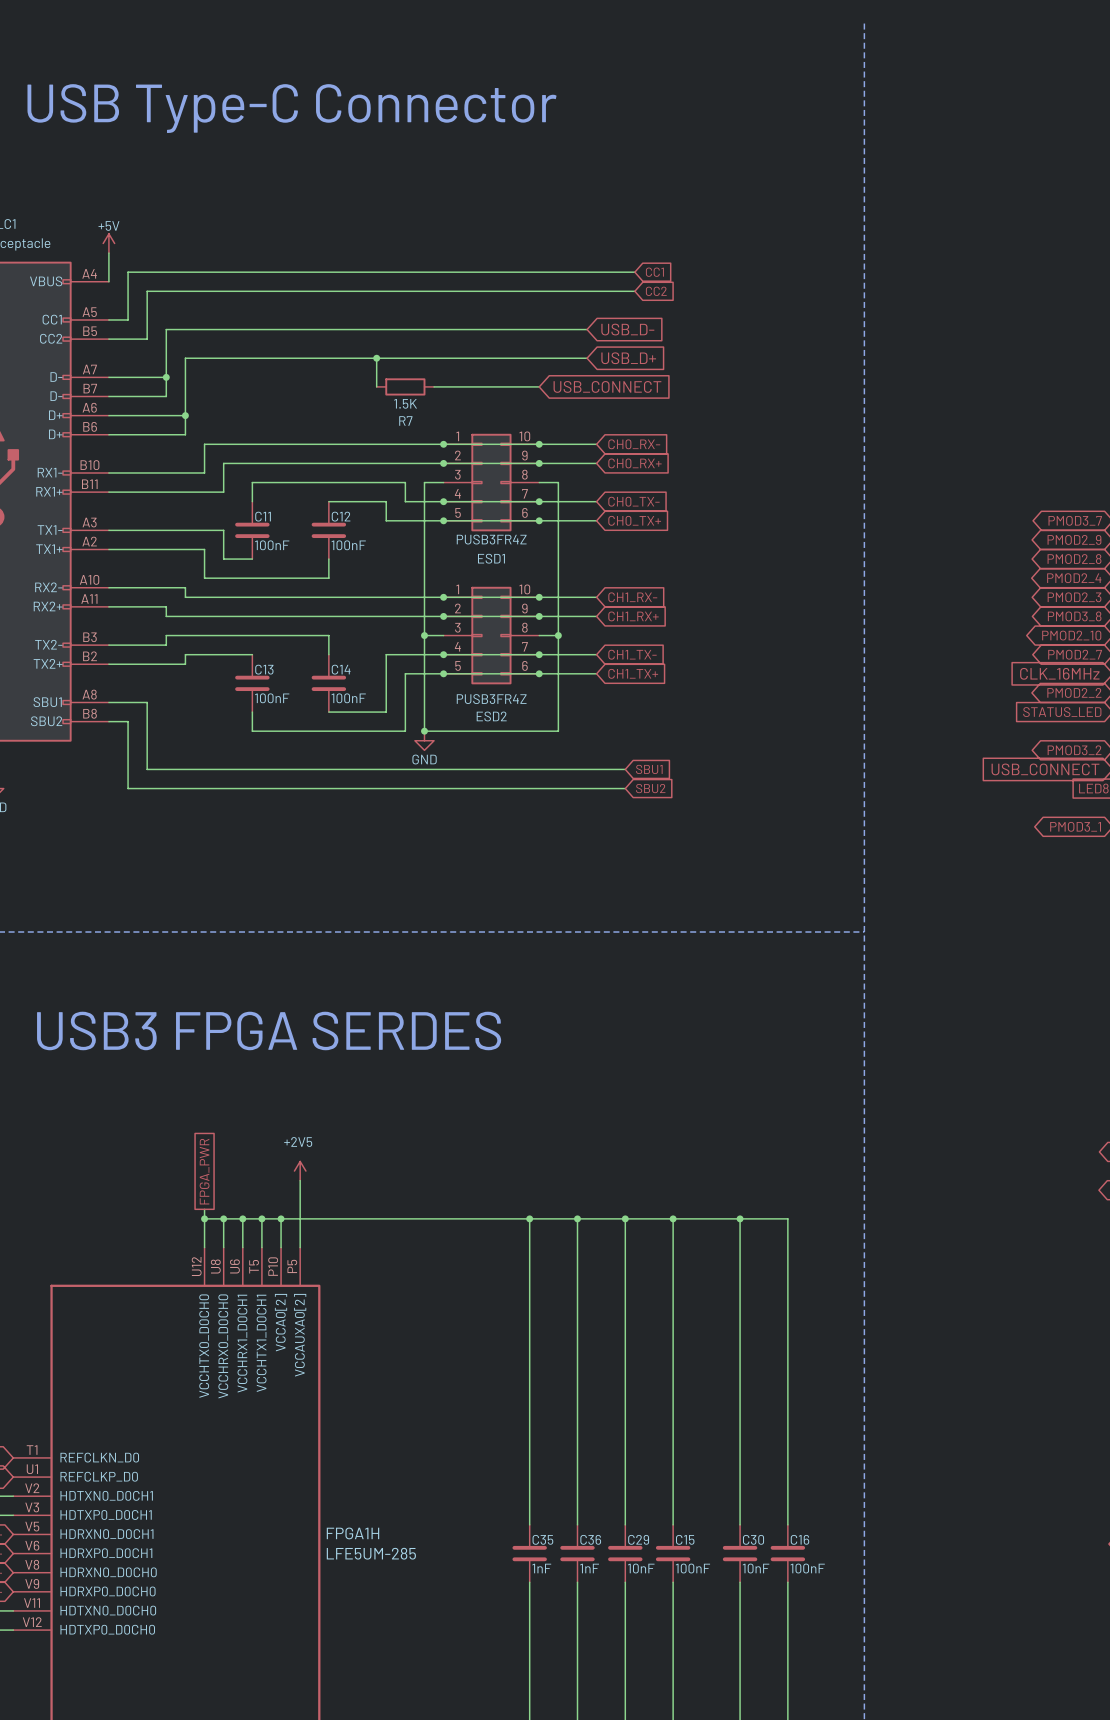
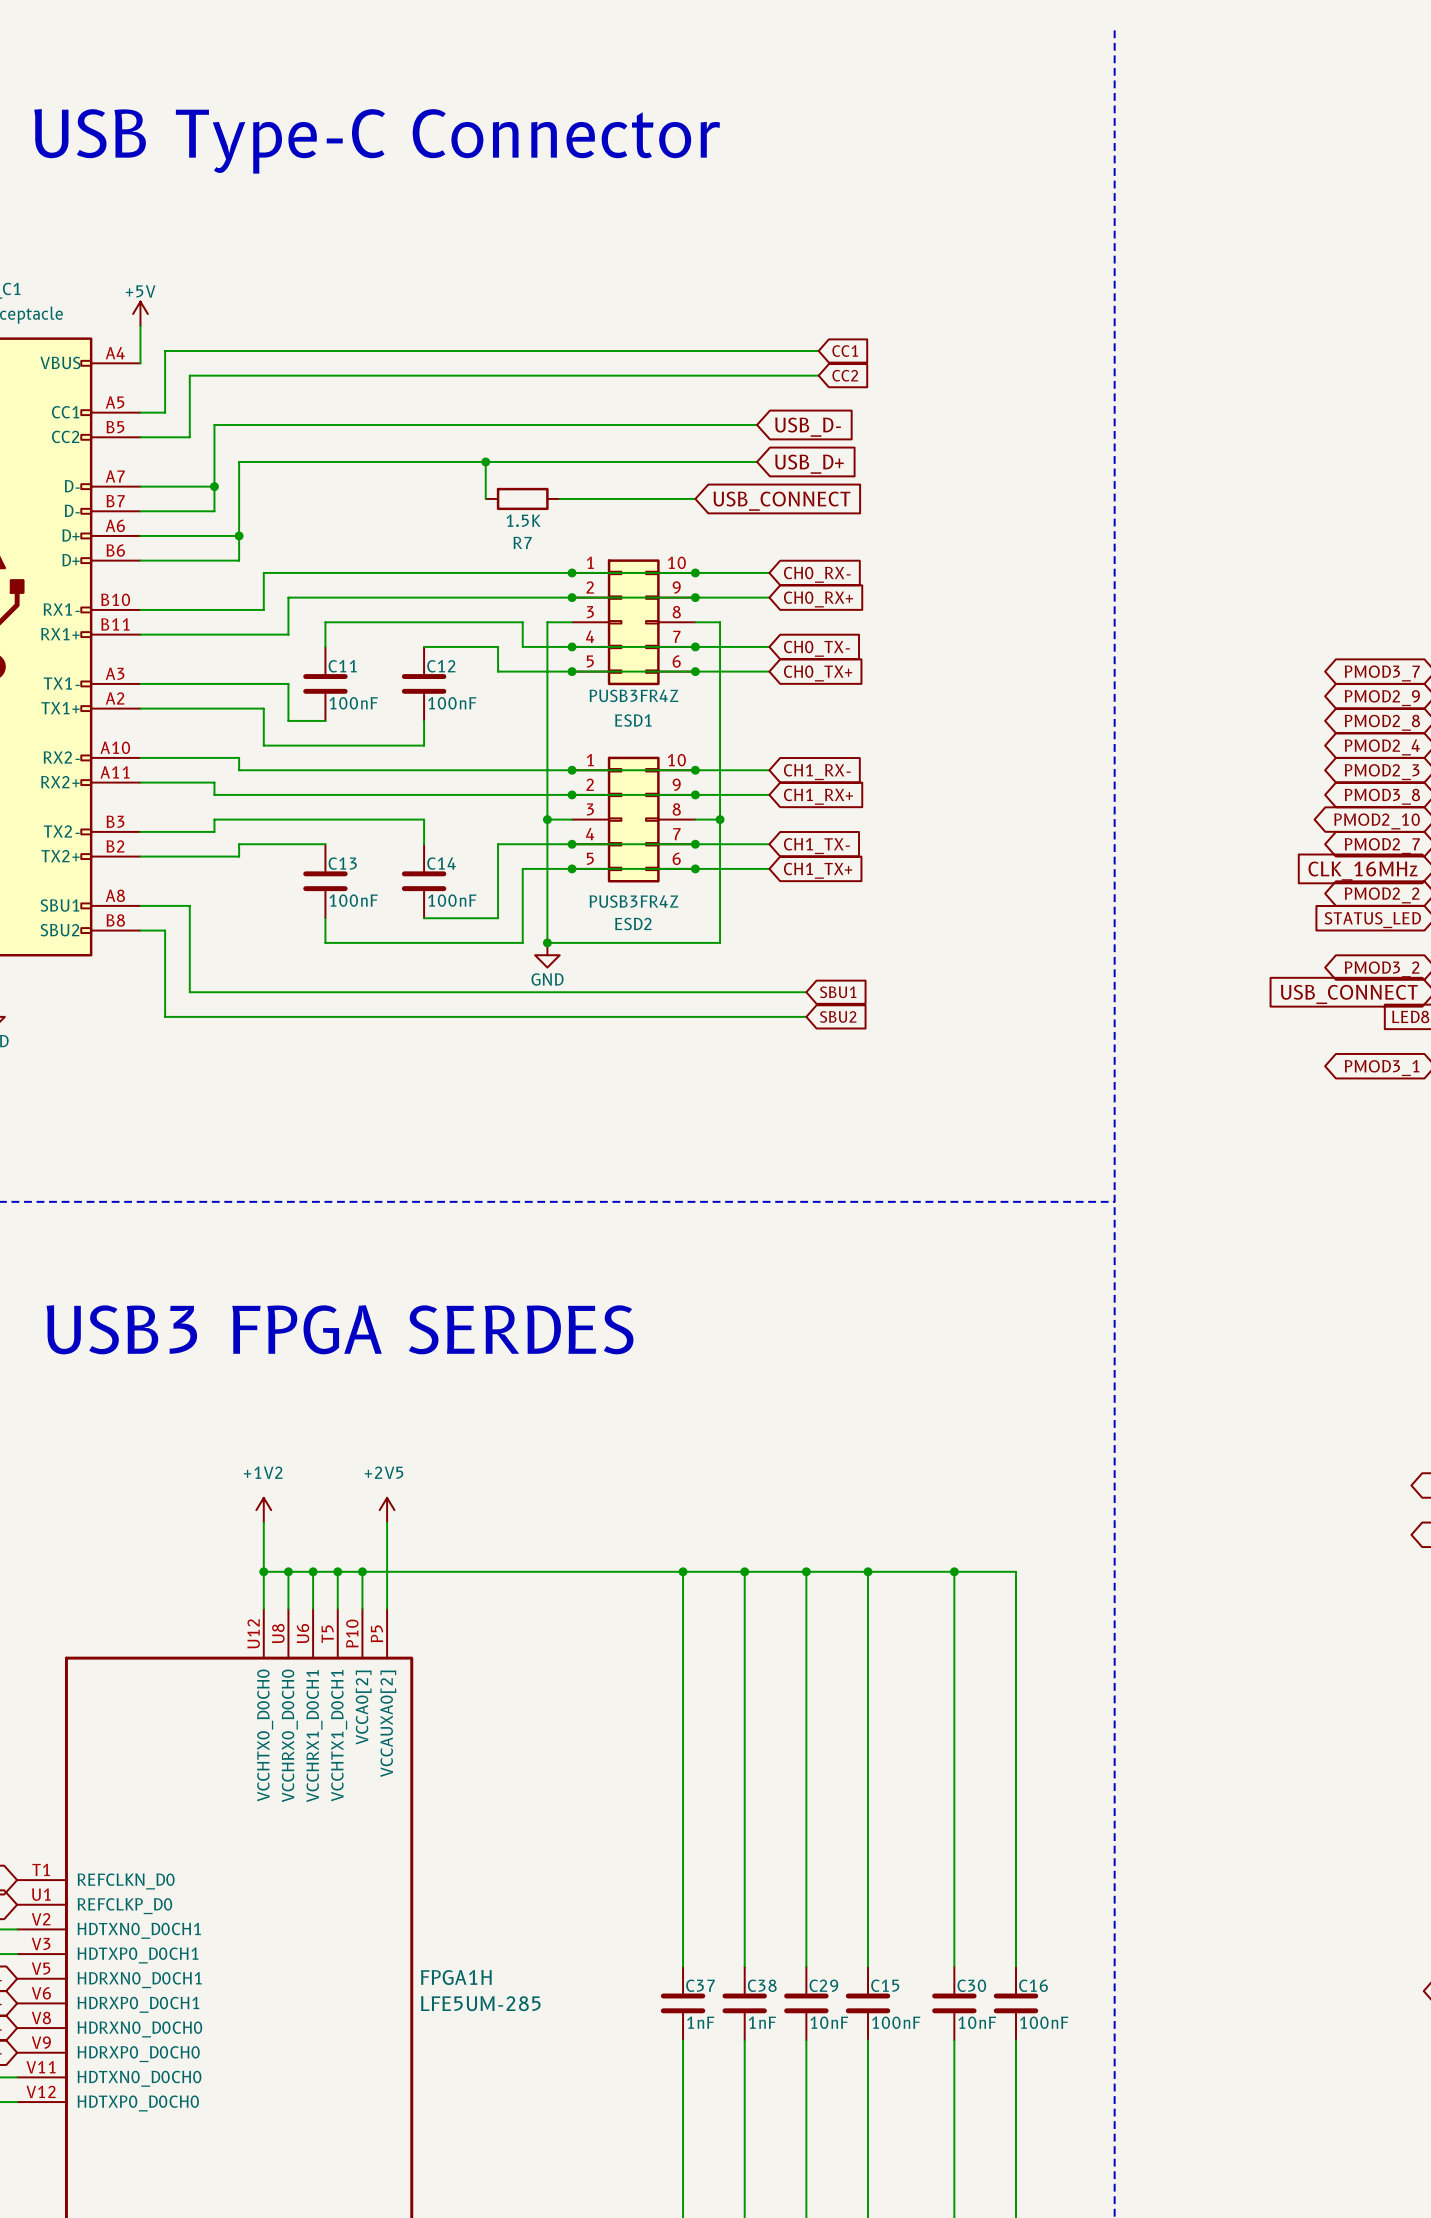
global label: FPGA_PWR (204, 1171) -> none
power symbol: none -> +1V2 (263, 1510)
wire: none -> (263, 1522) (263, 1559)
C35 name: C35 (542, 1539) -> C37 (700, 1985)
C36 name: C36 (590, 1539) -> C38 (762, 1985)

